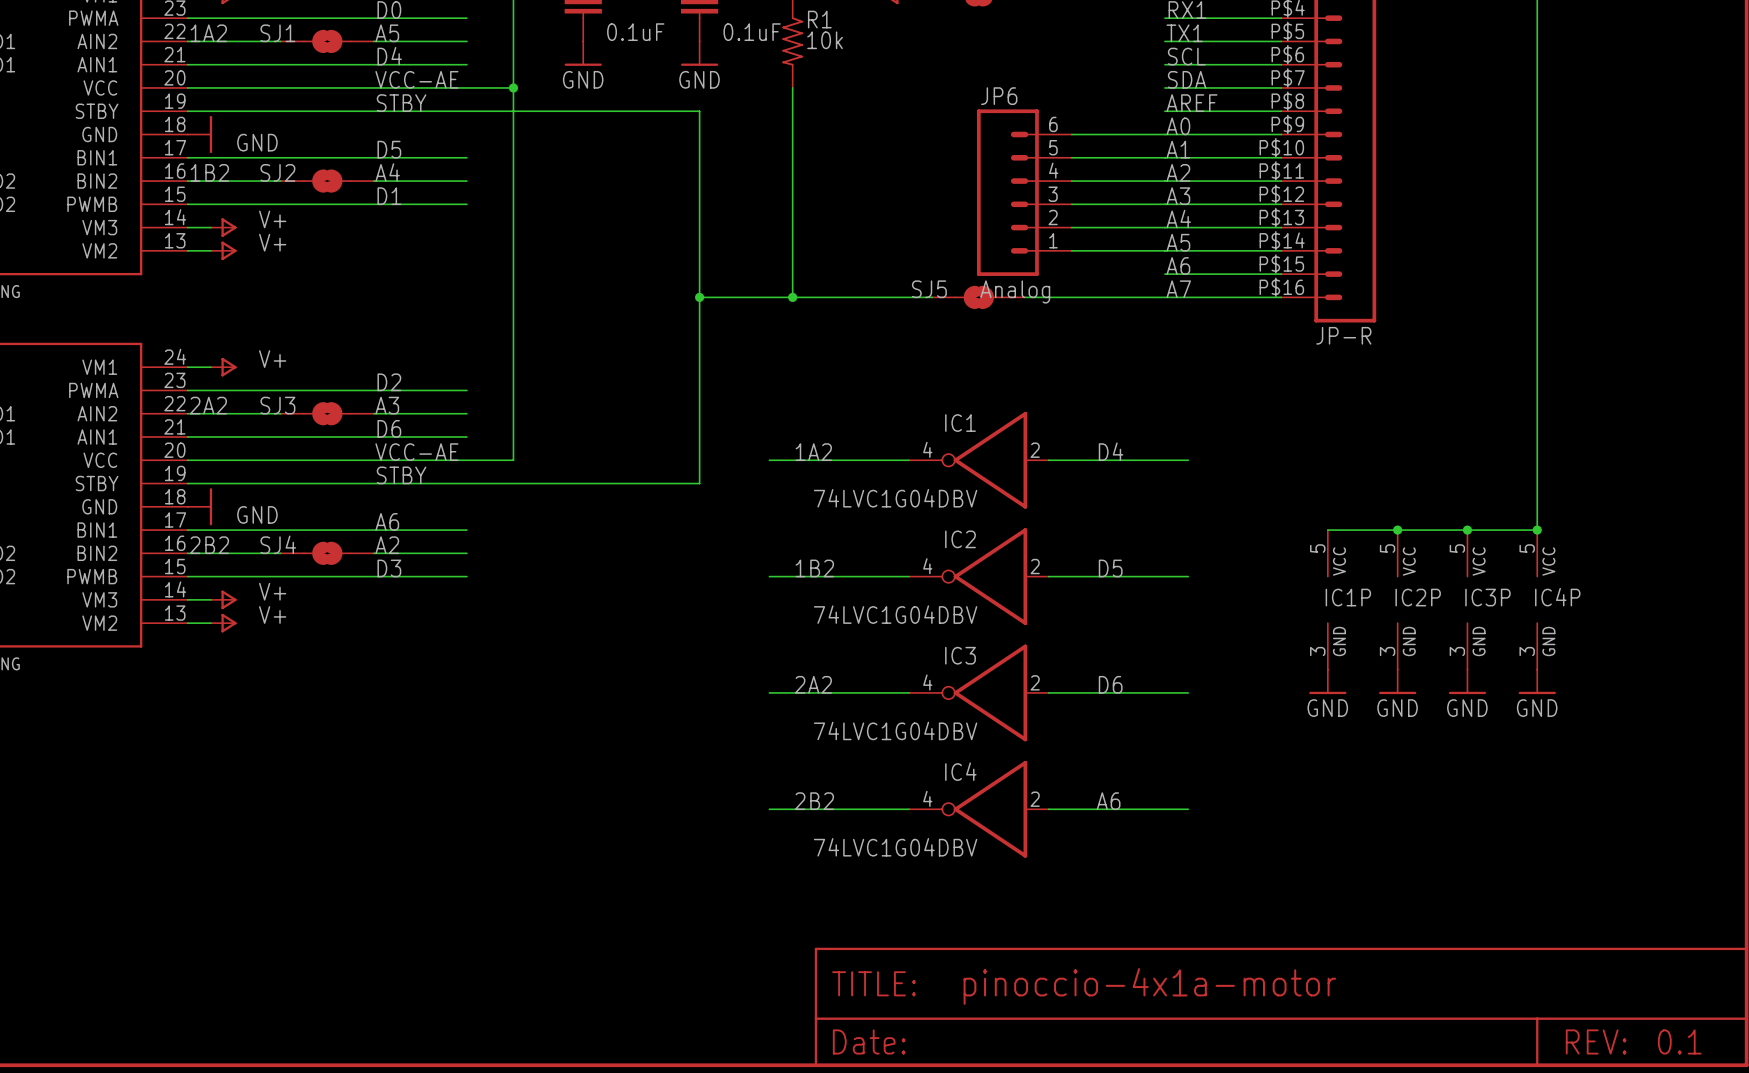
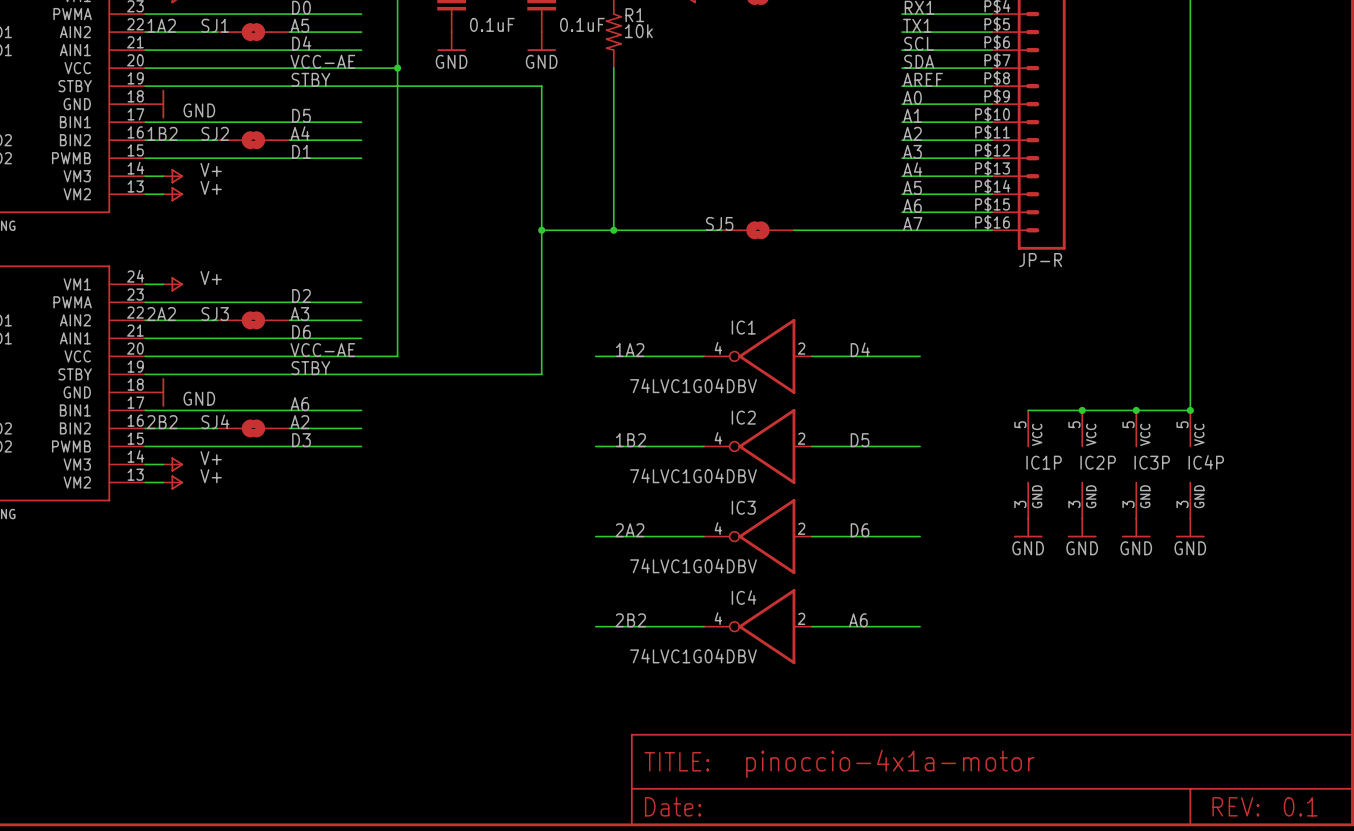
wire: (1071, 134) (1164, 134) -> none
wire: (1071, 157) (1164, 157) -> none
wire: (1071, 181) (1164, 181) -> none
JP6: Analog (1024, 192) -> none
wire: (1071, 204) (1164, 204) -> none
wire: (1071, 227) (1164, 227) -> none
wire: (1071, 250) (1164, 250) -> none

